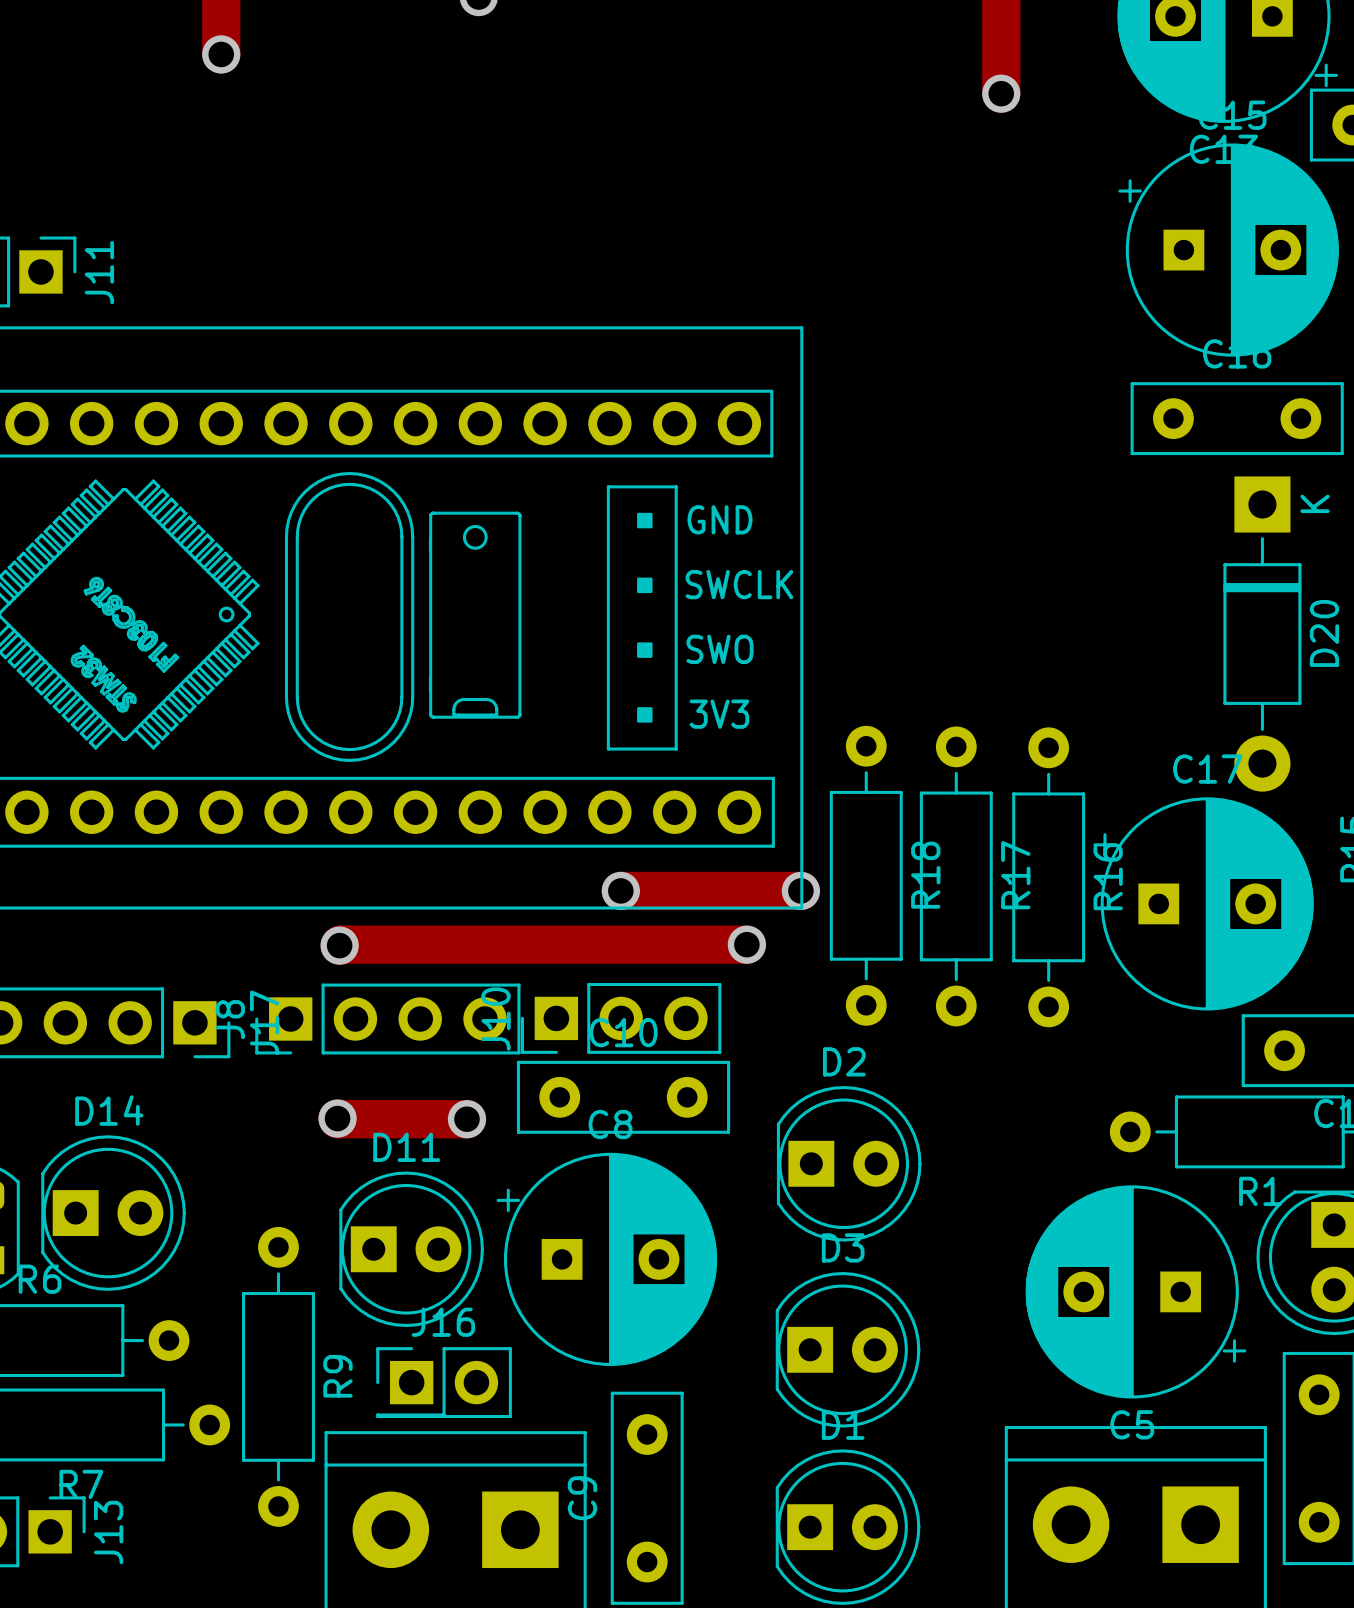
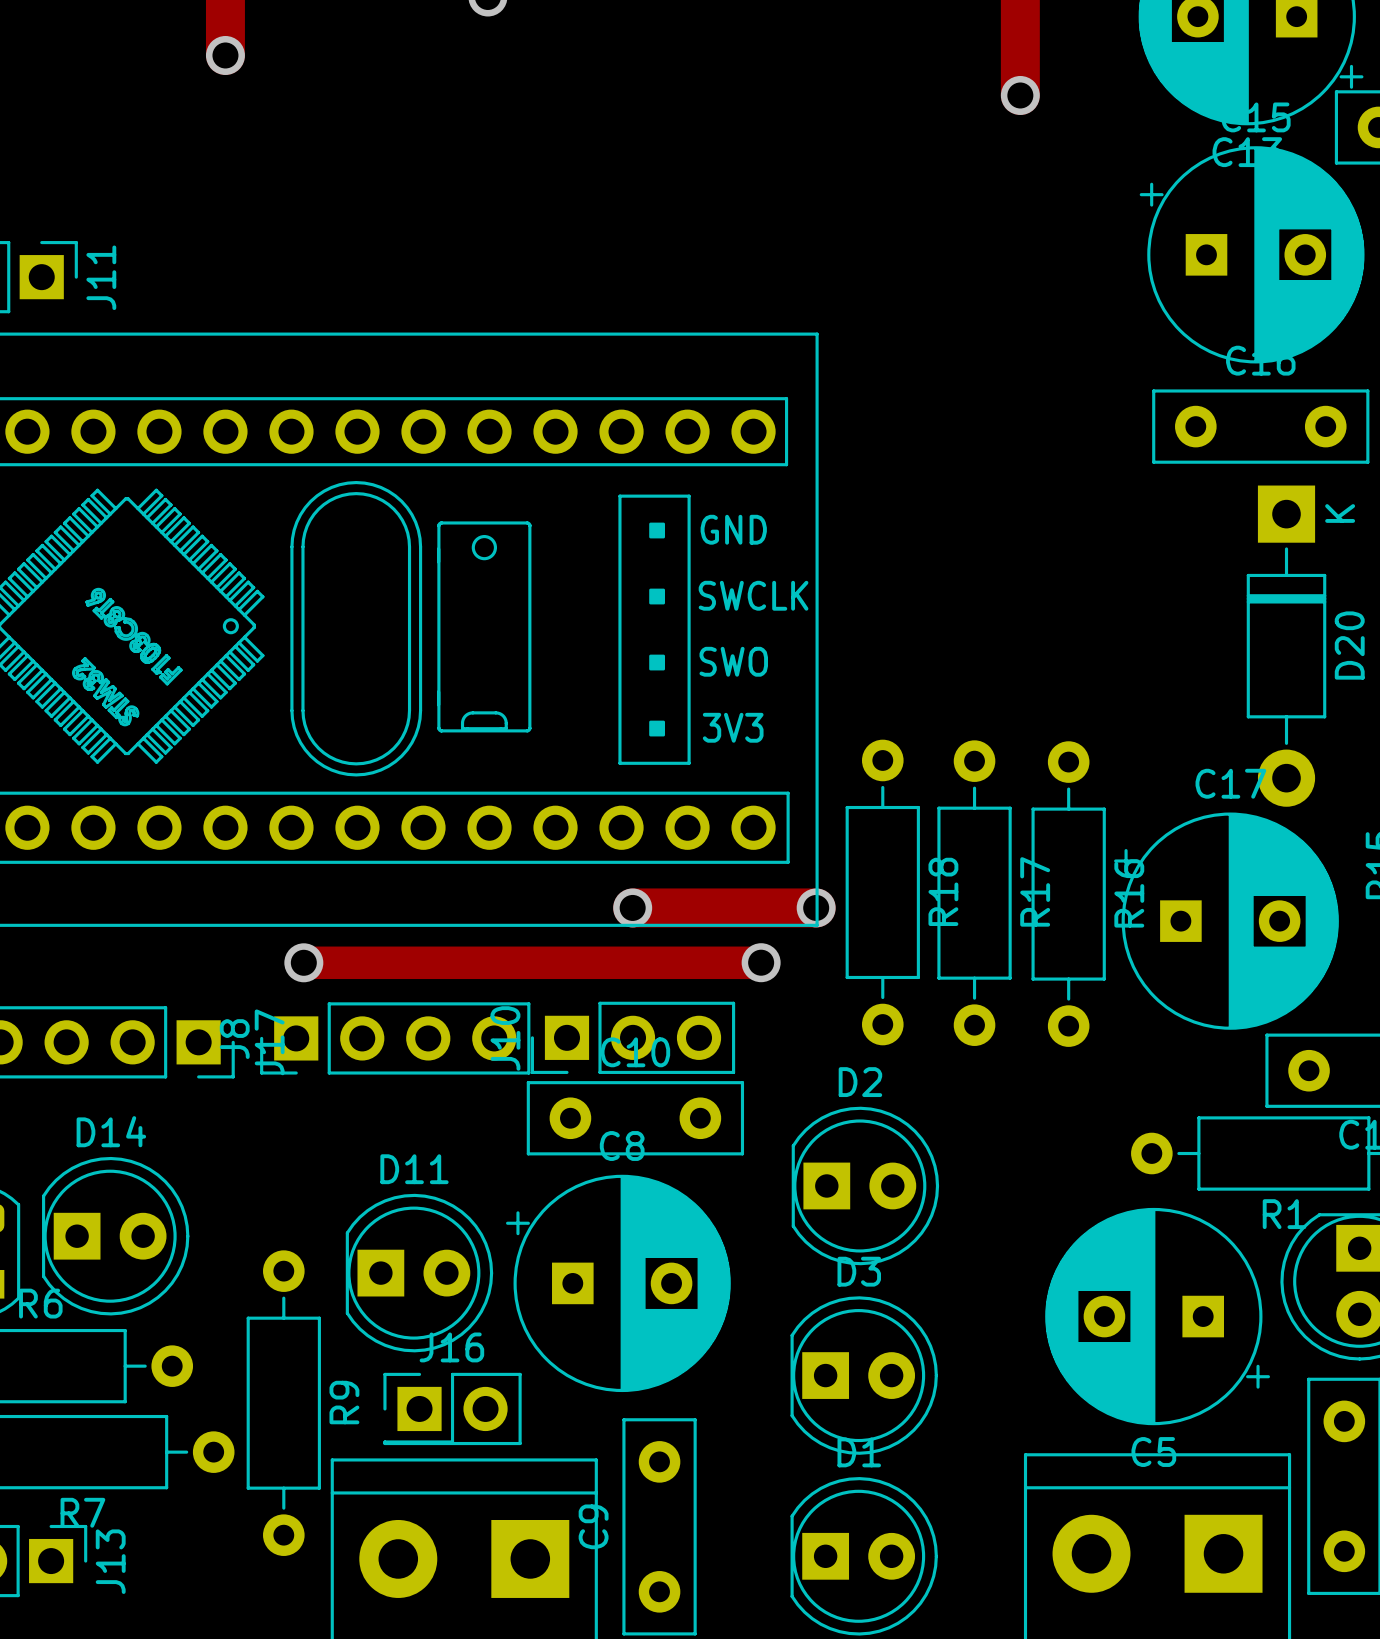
track: (746, 944) (339, 945) -> (761, 962) (303, 962)
via position: (339, 945) -> (303, 962)
track: (337, 1118) (466, 1119) -> none
via: (337, 1118) -> none
via: (466, 1119) -> none

